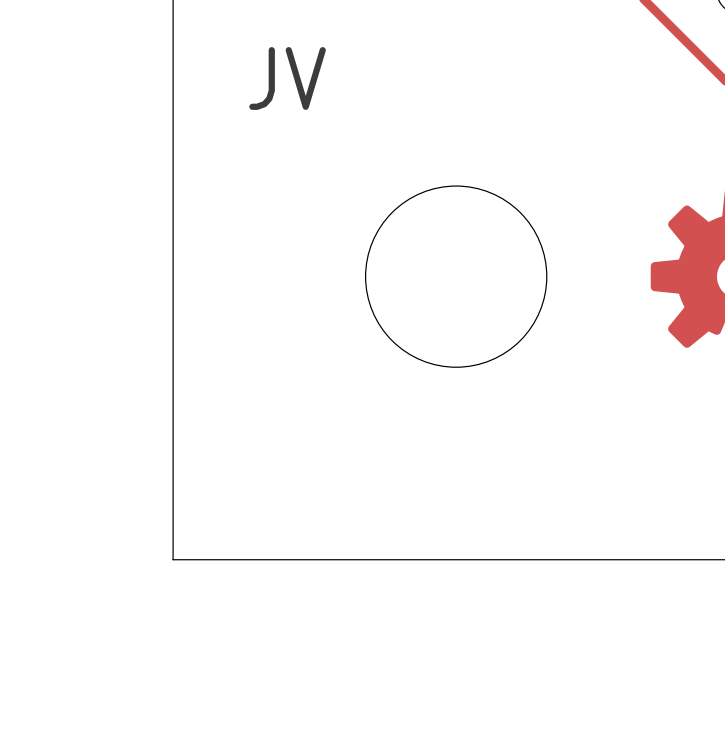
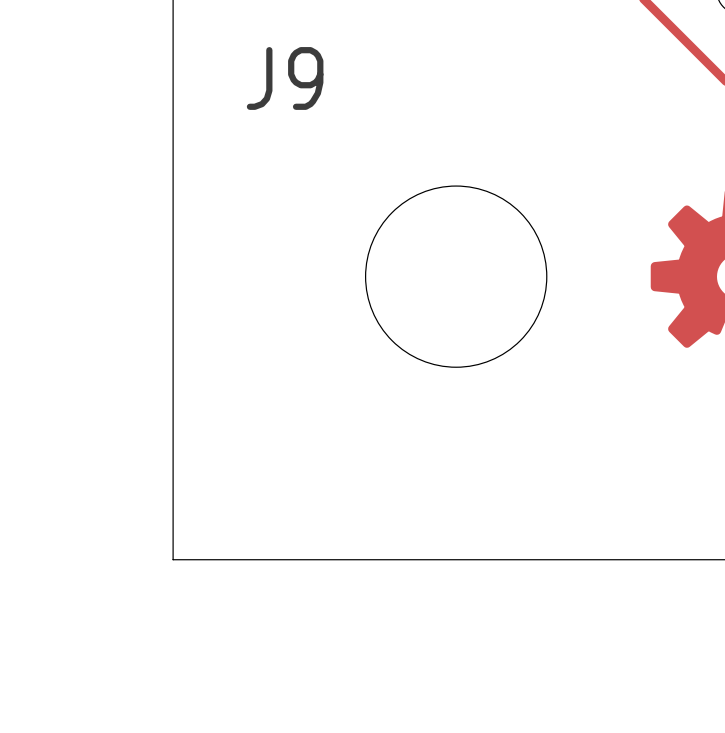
JV name: JV (287, 78) -> J9 (285, 78)

